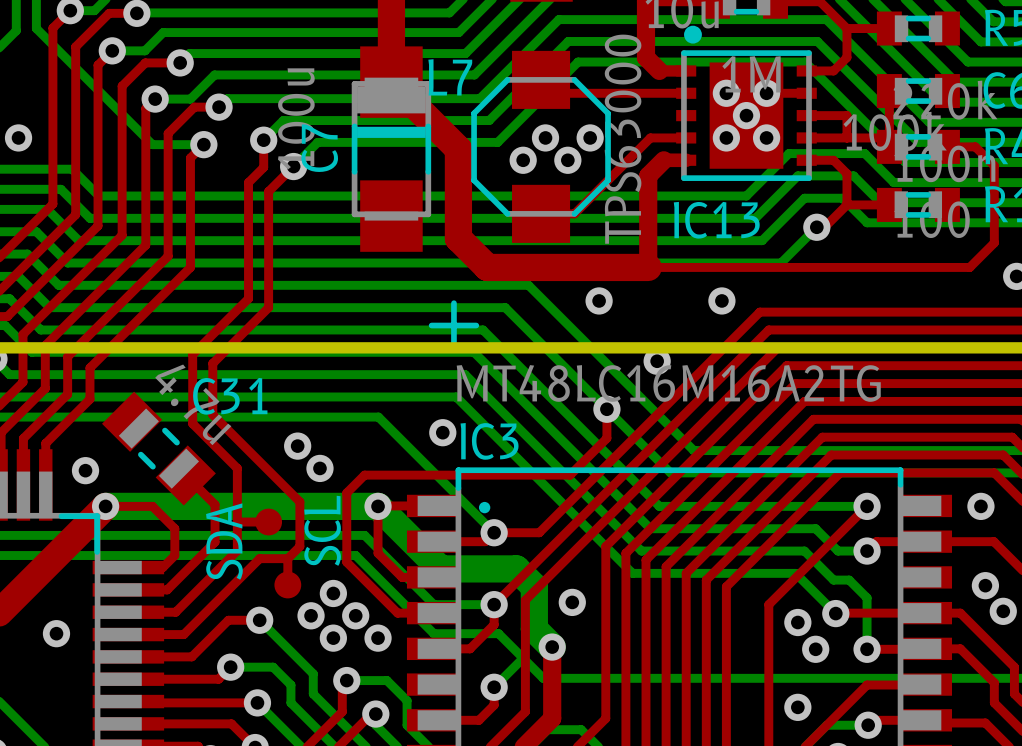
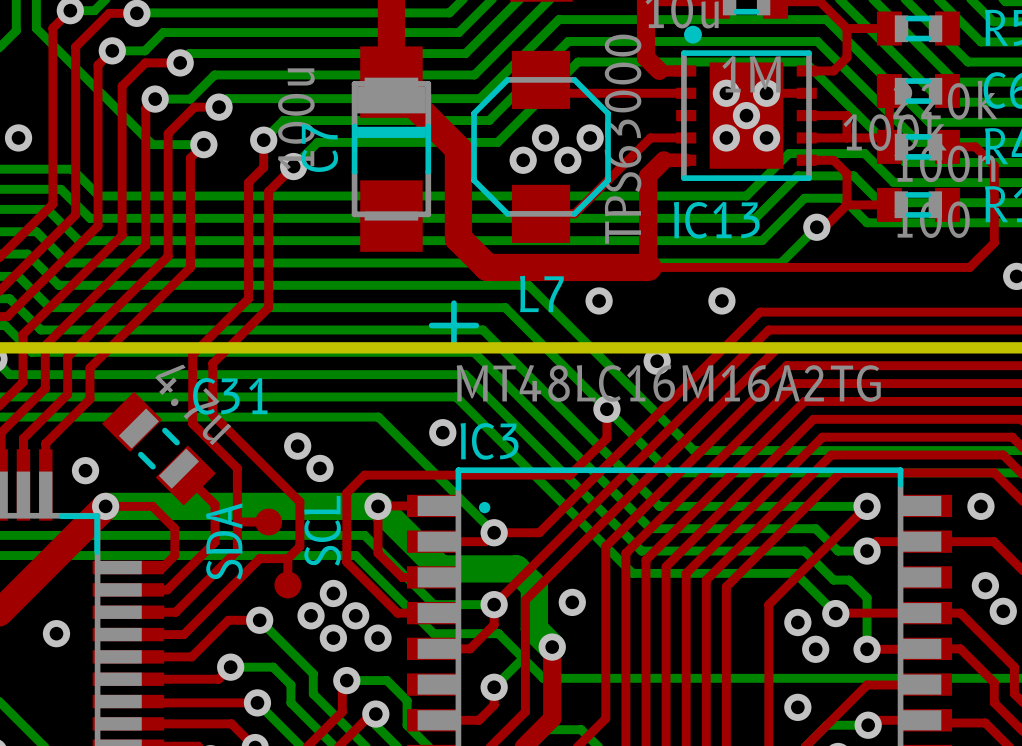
L7 name position: L7 (450, 77) -> L7 (541, 293)

